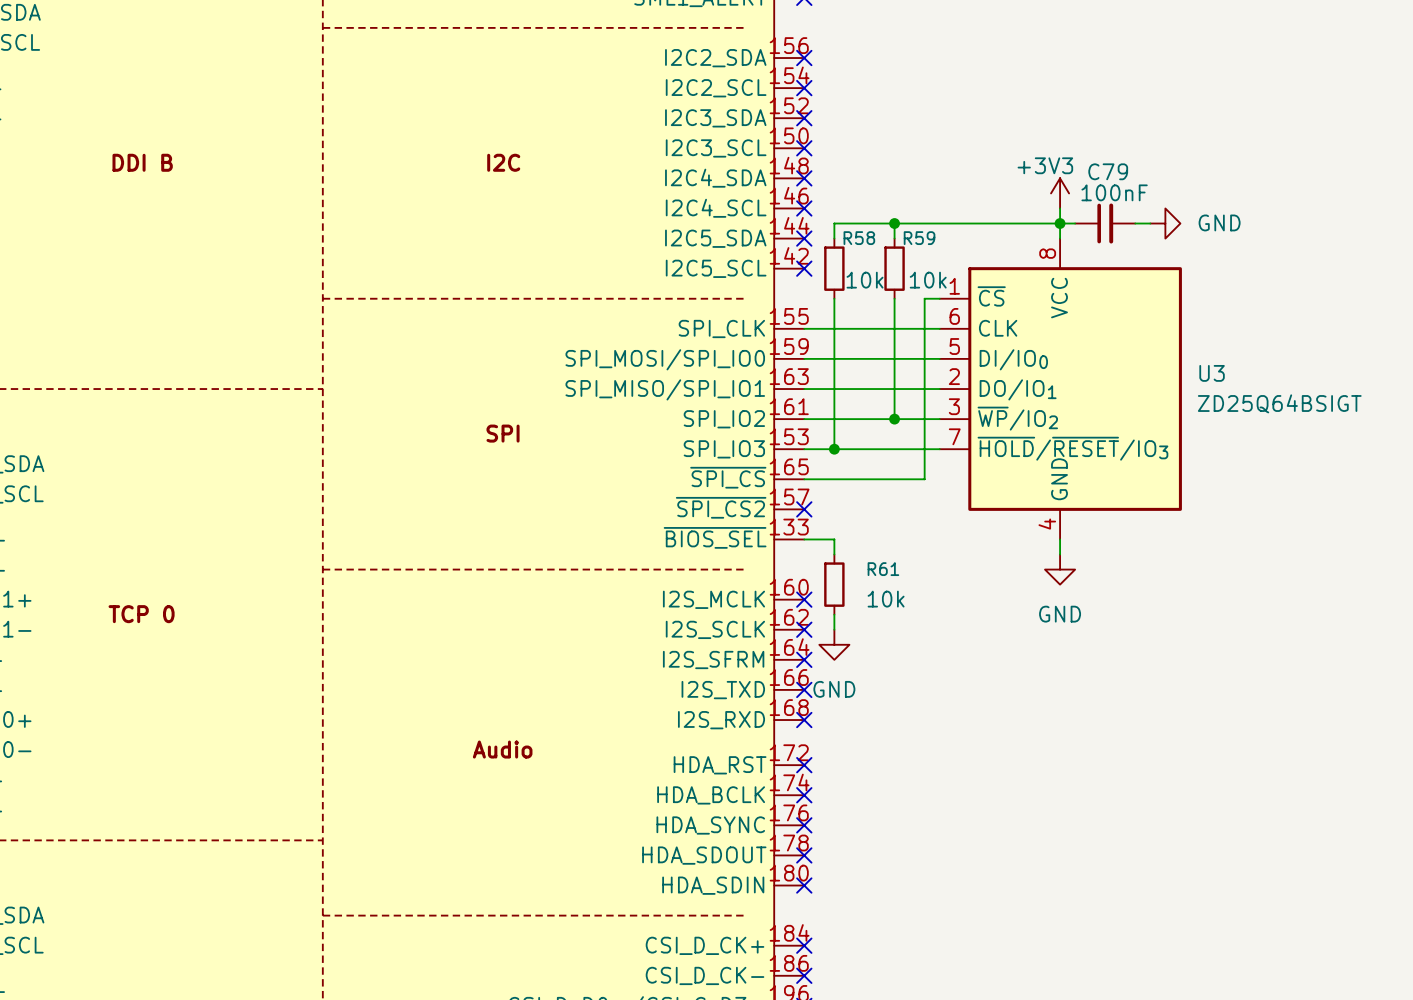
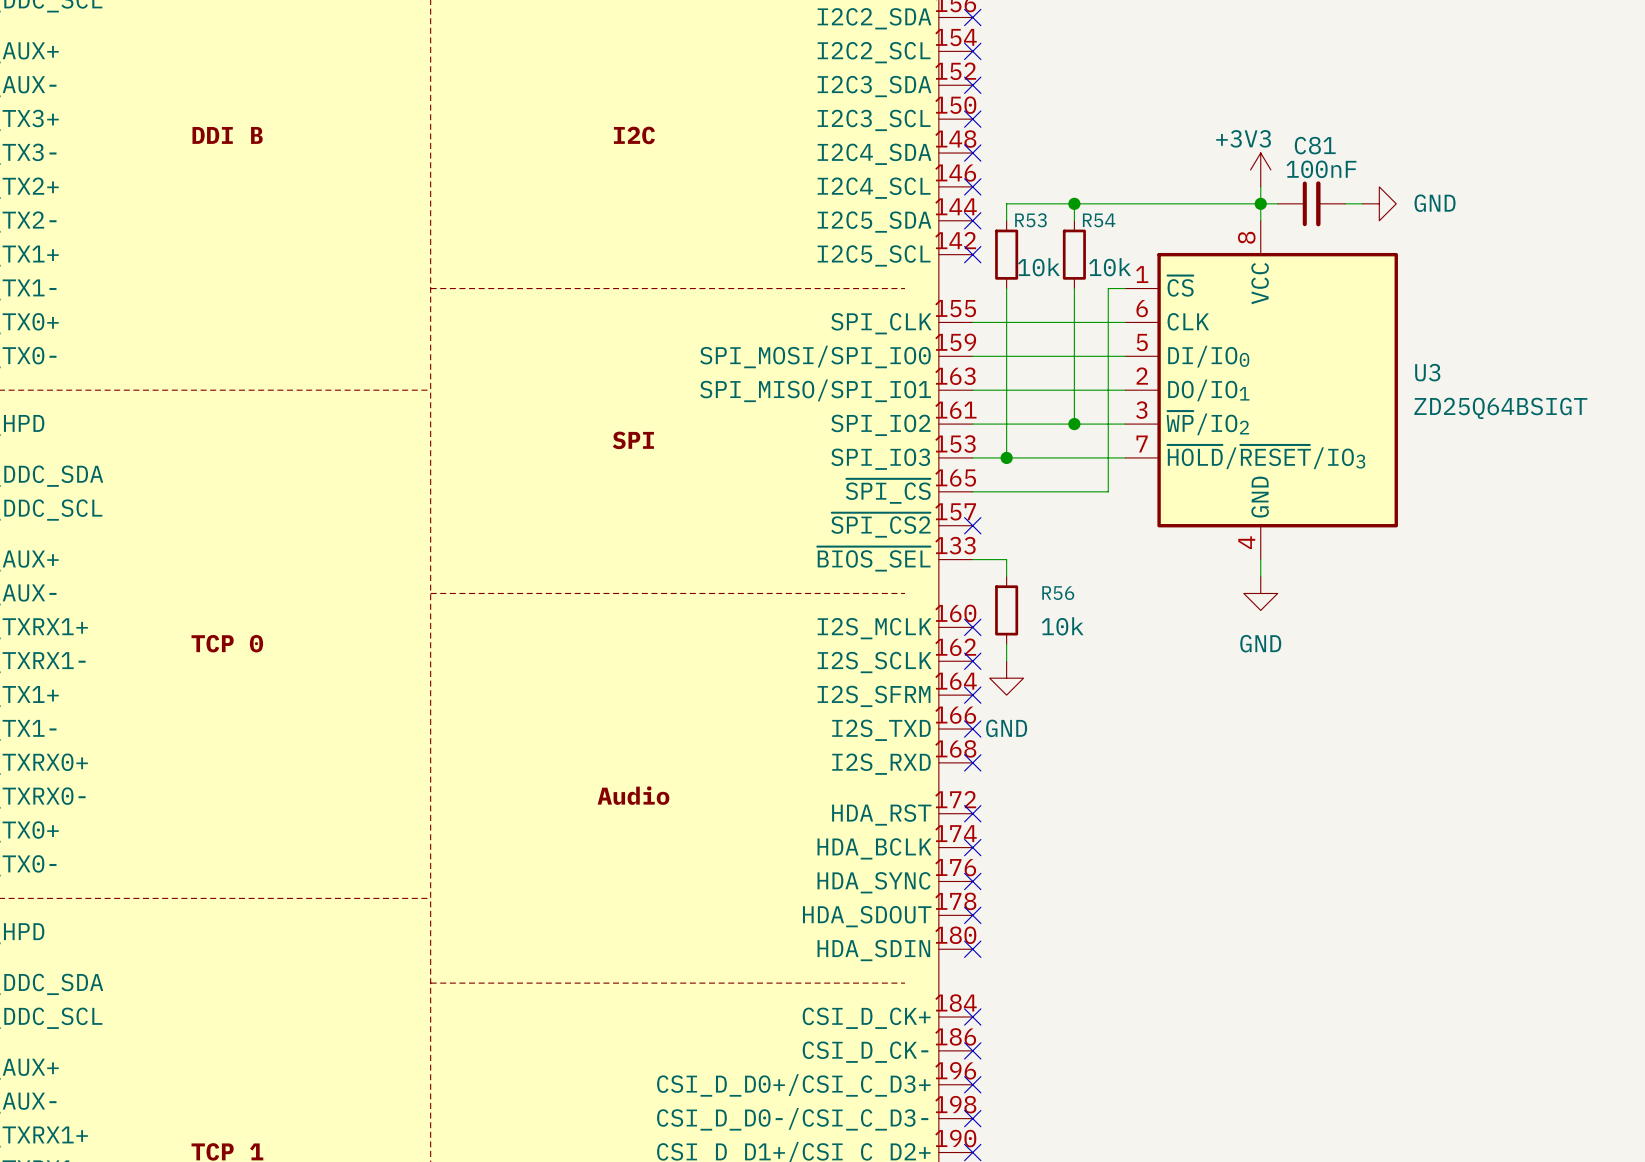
C79 name: C79 (1108, 171) -> C81 (1315, 145)
R58 name: R58 (859, 238) -> R53 (1030, 220)
R59 name: R59 (919, 238) -> R54 (1099, 220)
R61 name: R61 (883, 569) -> R56 (1058, 593)

